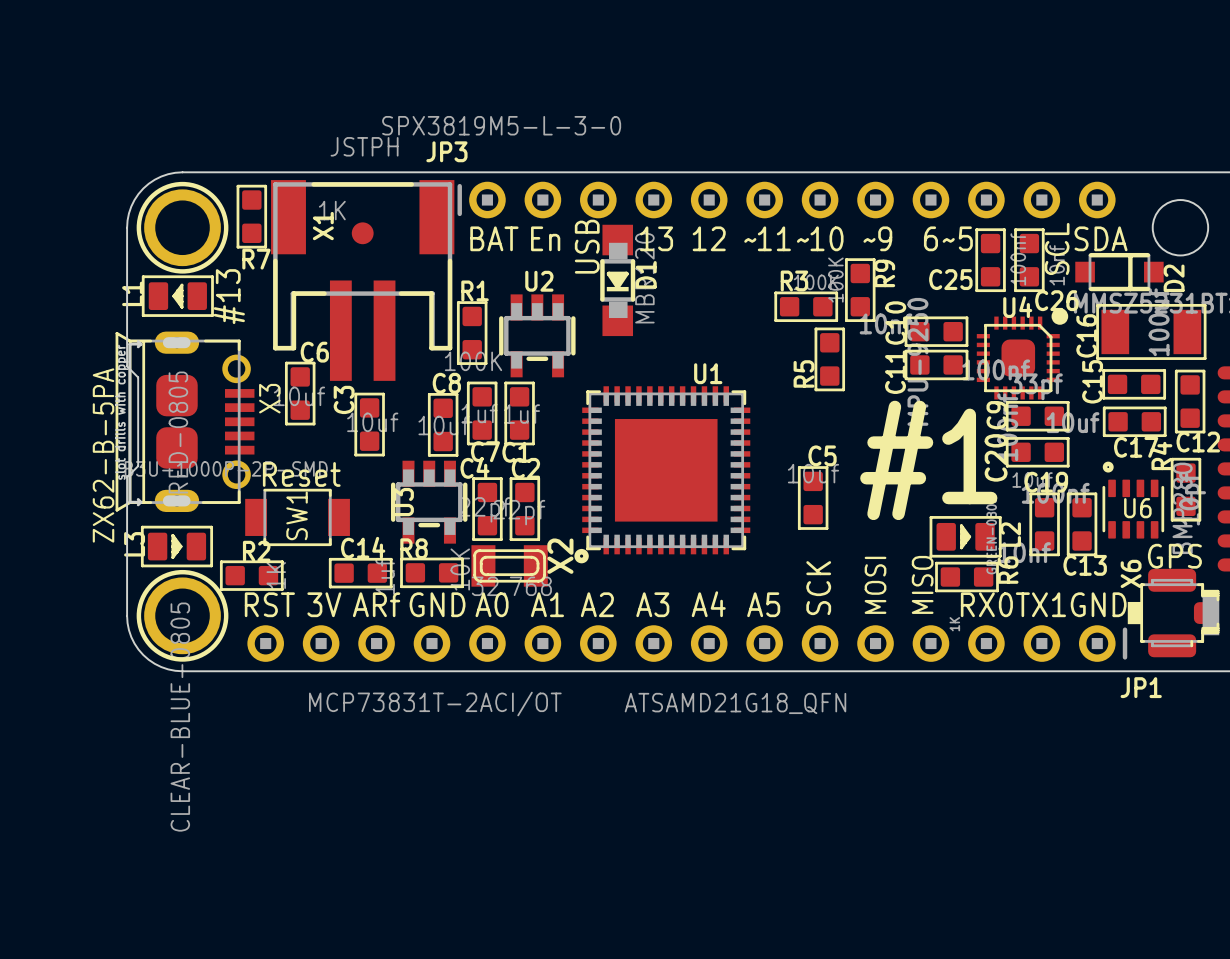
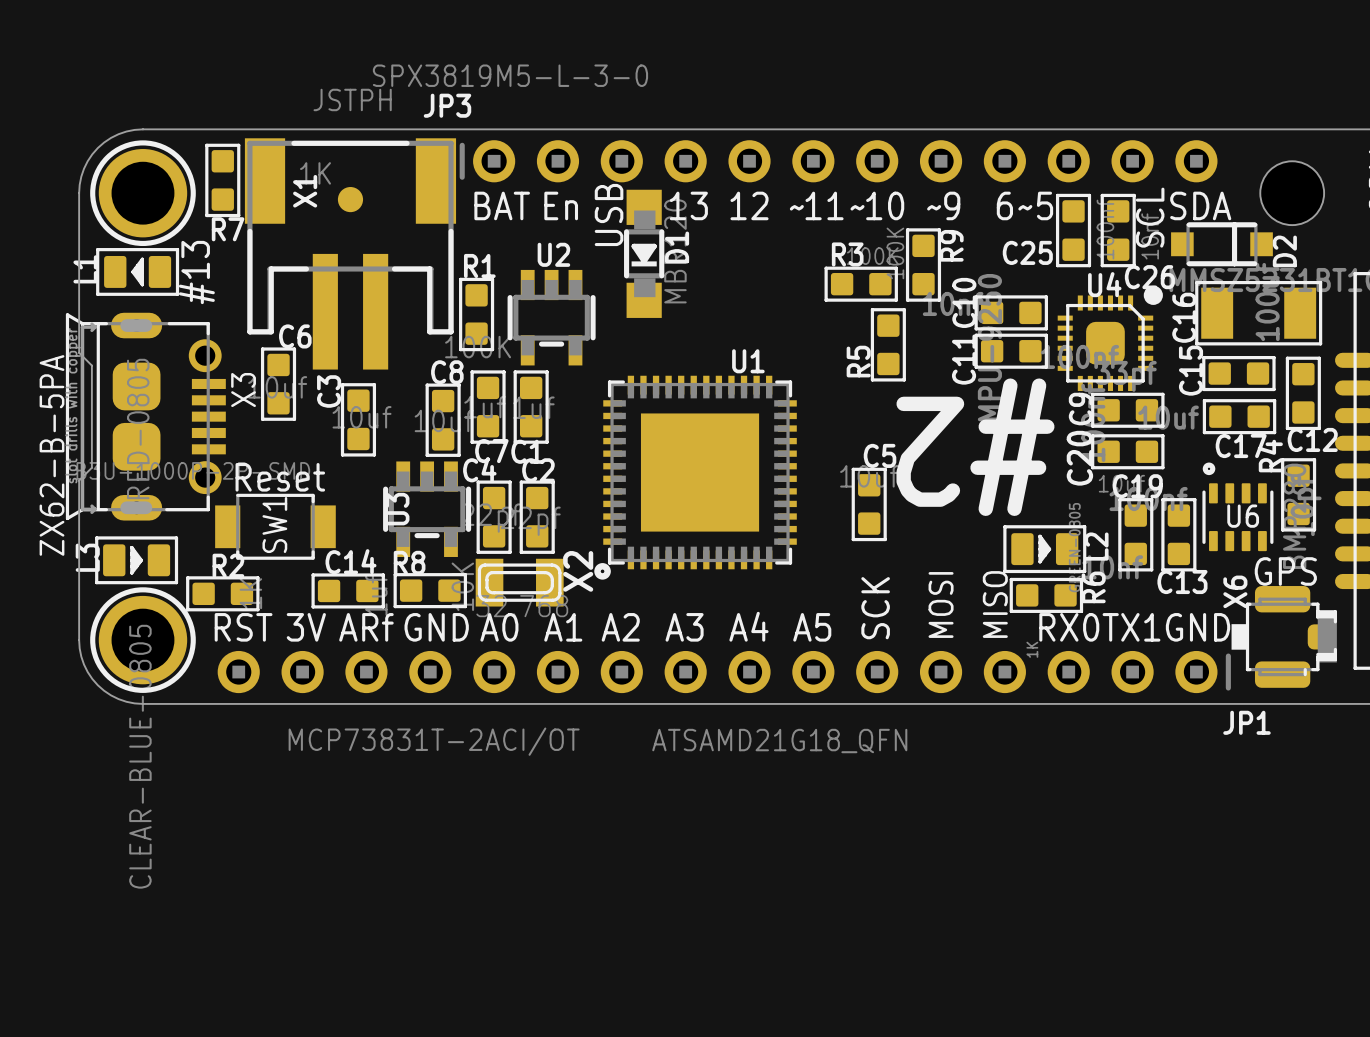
text: none -> #2 (975, 447)
text: #1 (928, 460) -> none

